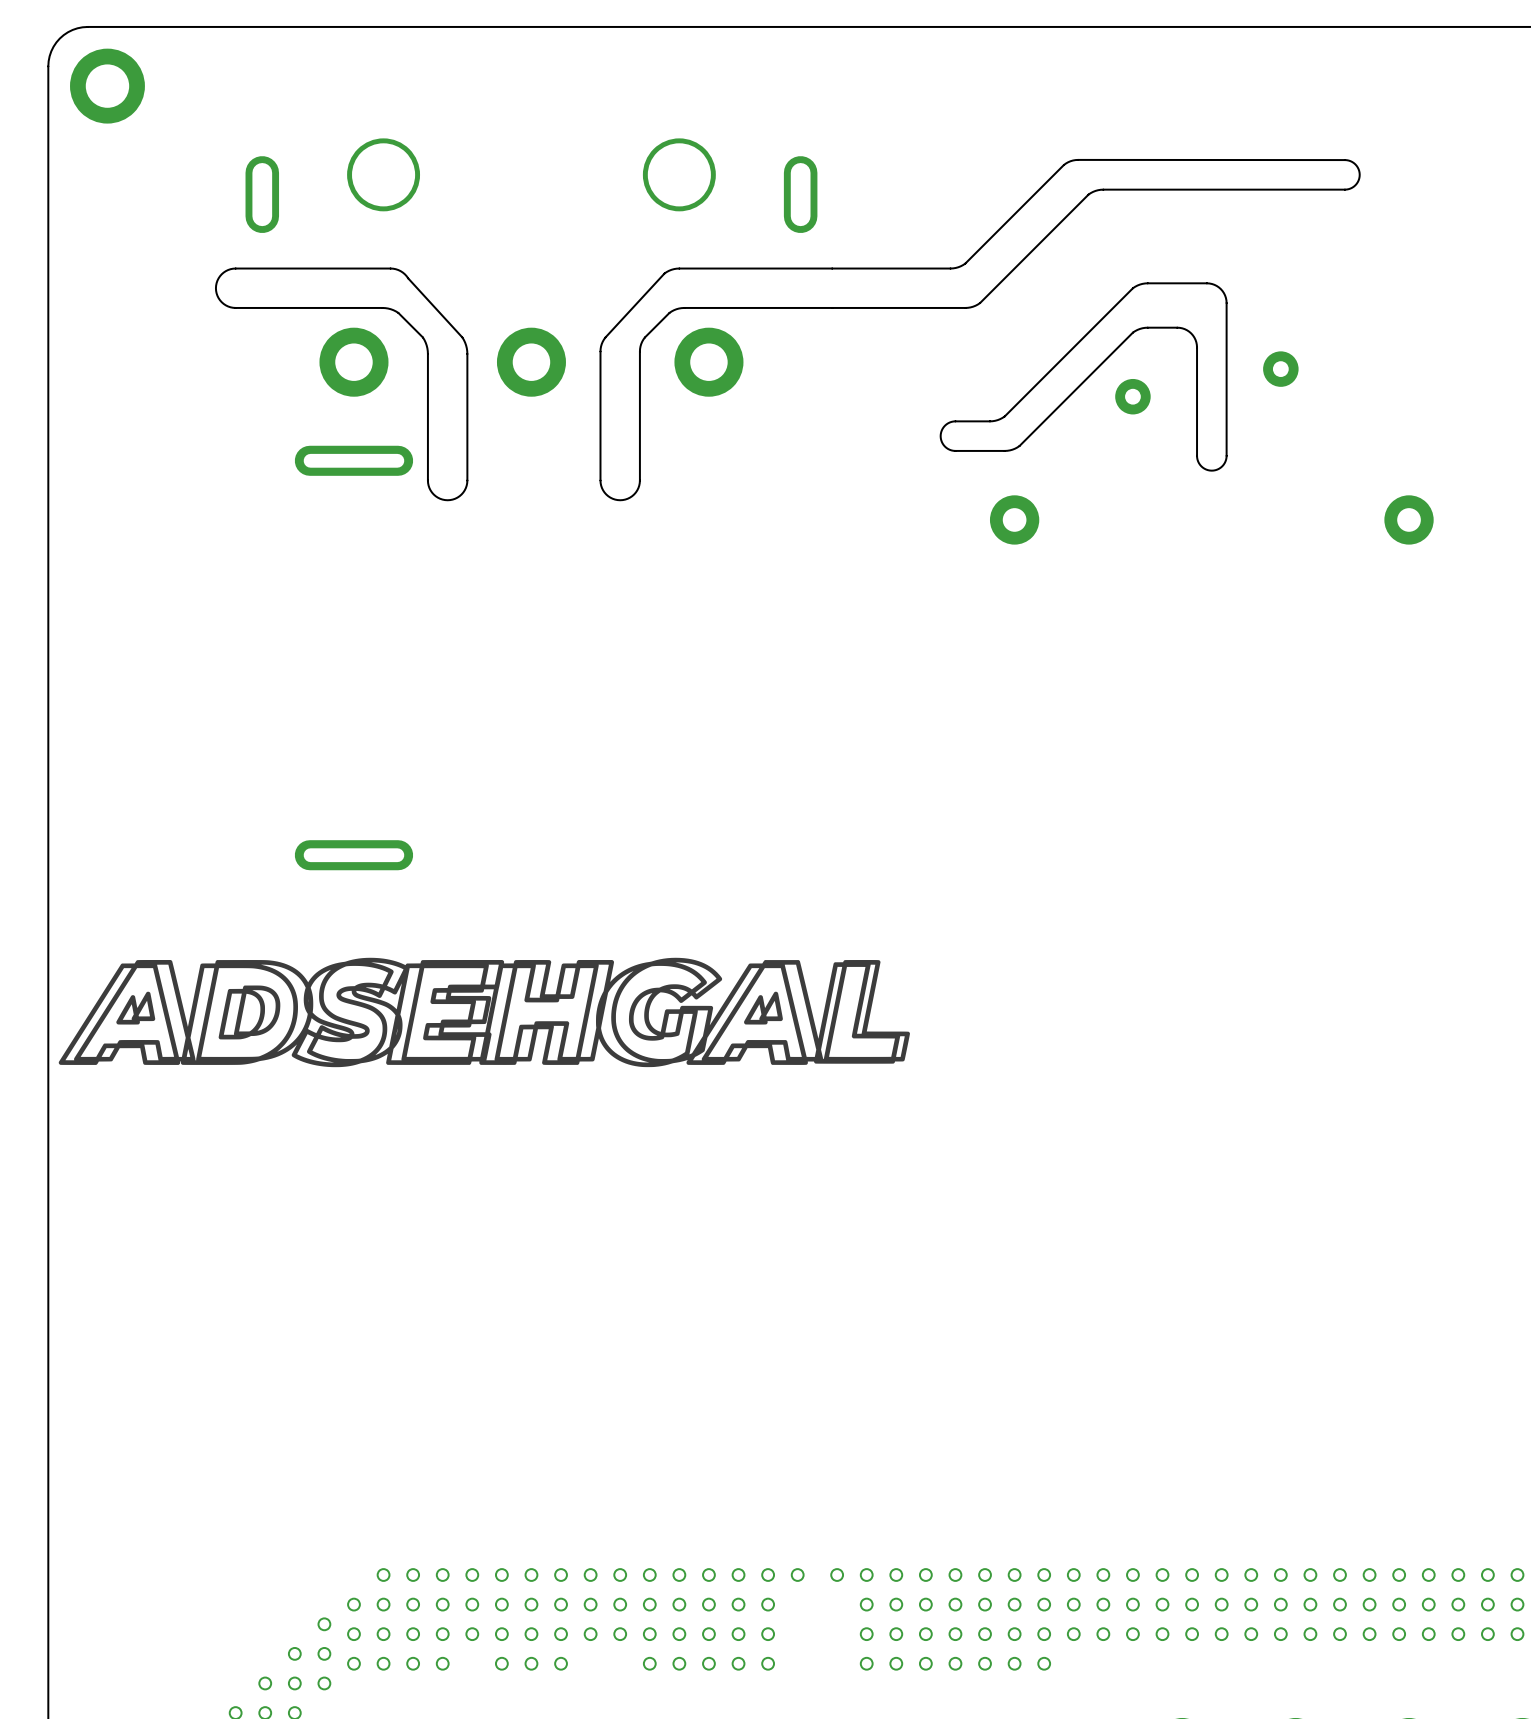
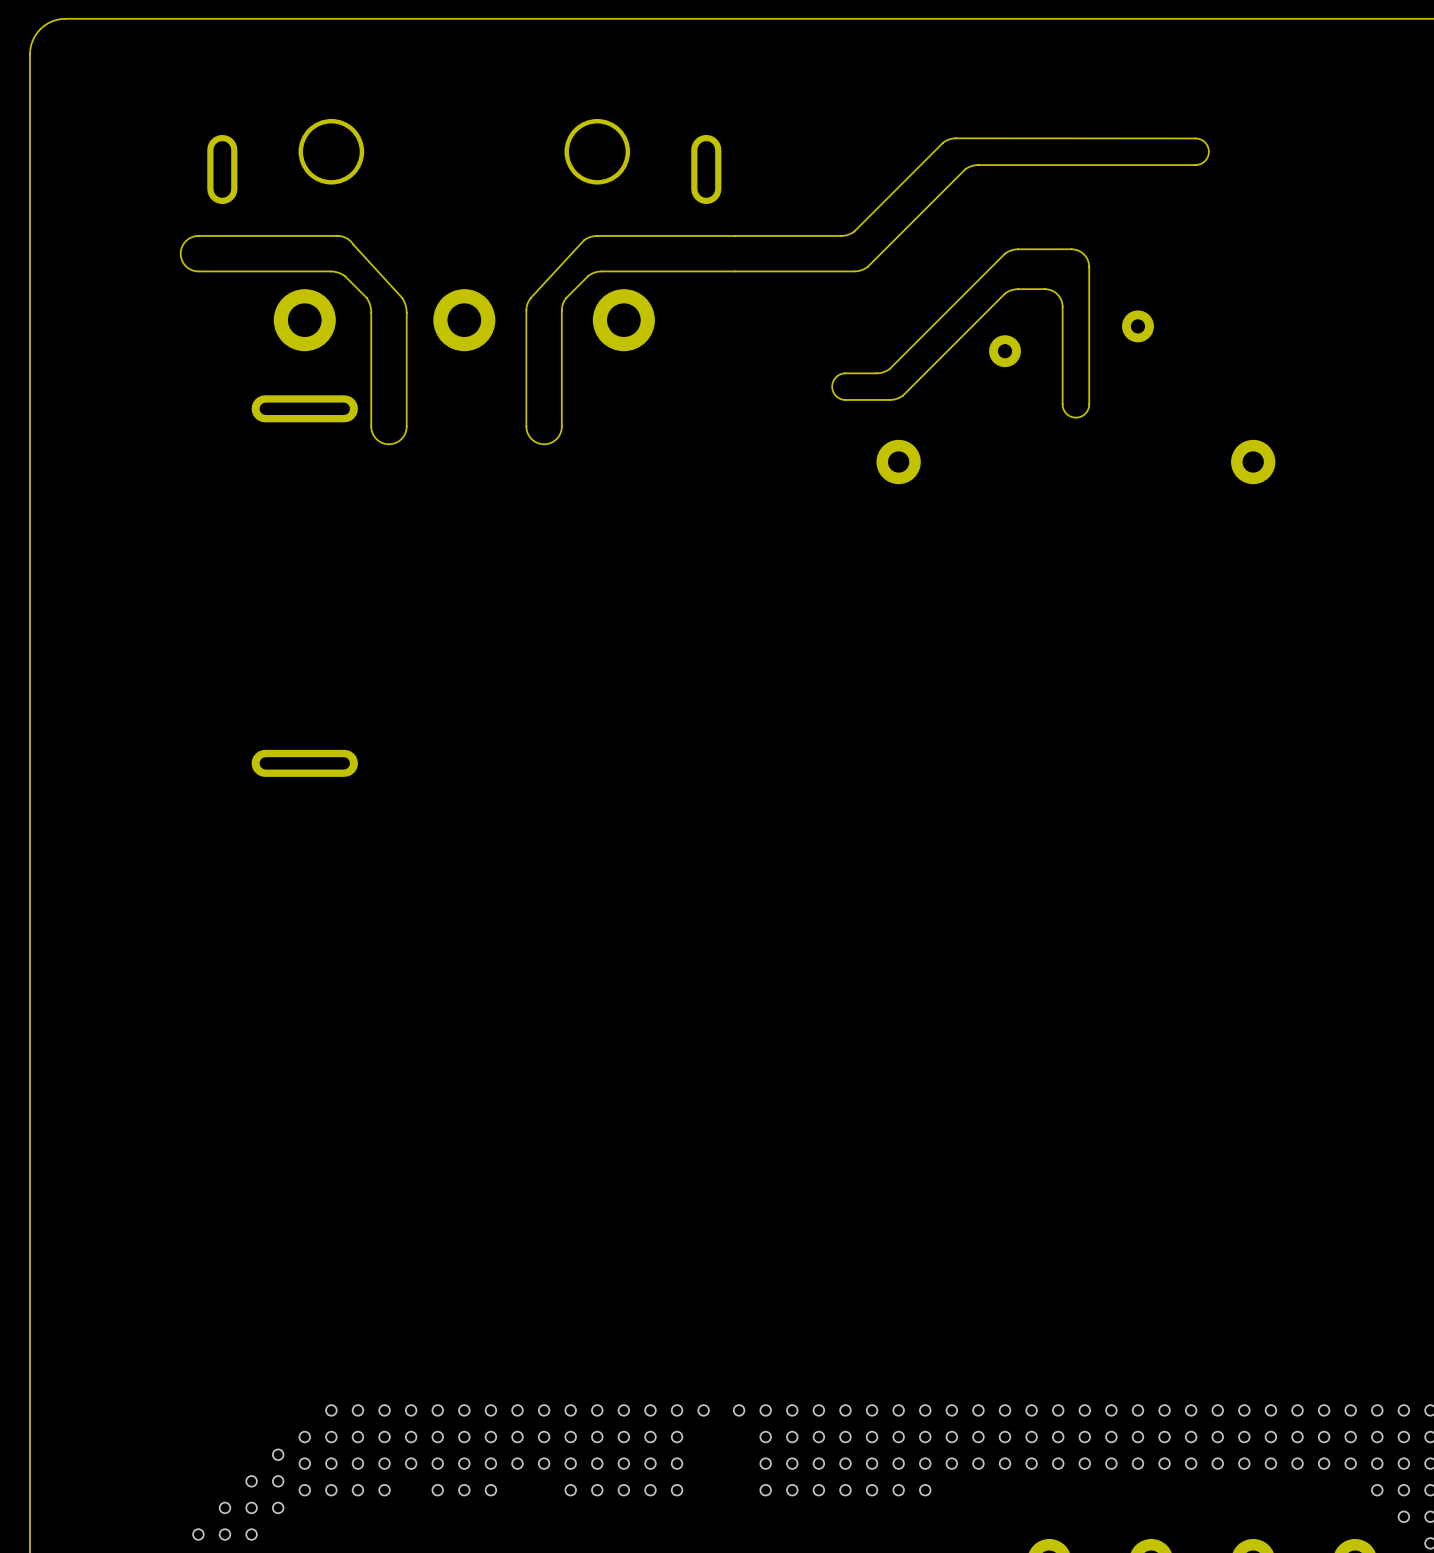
part: (107, 86) -> none
drawing: [58, 957, 910, 1068] -> none

